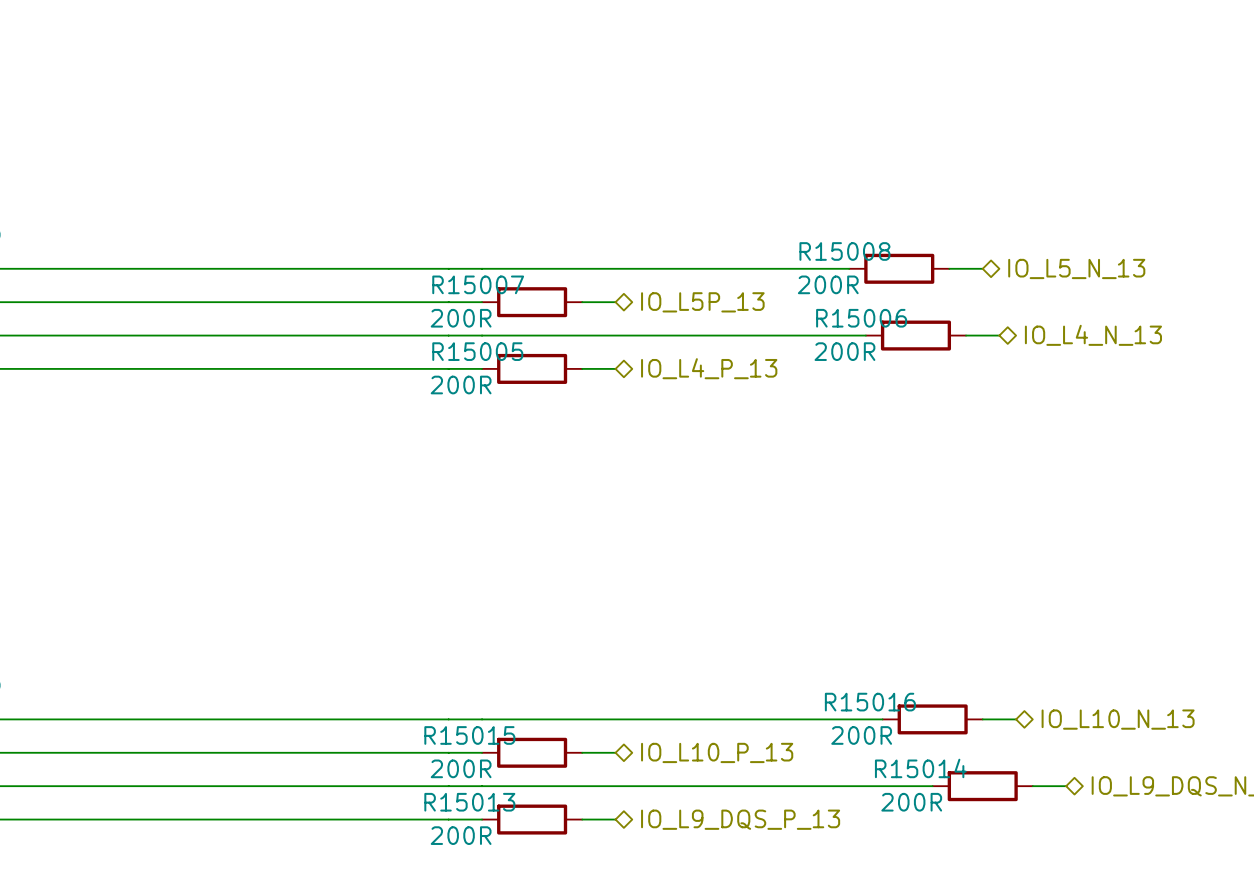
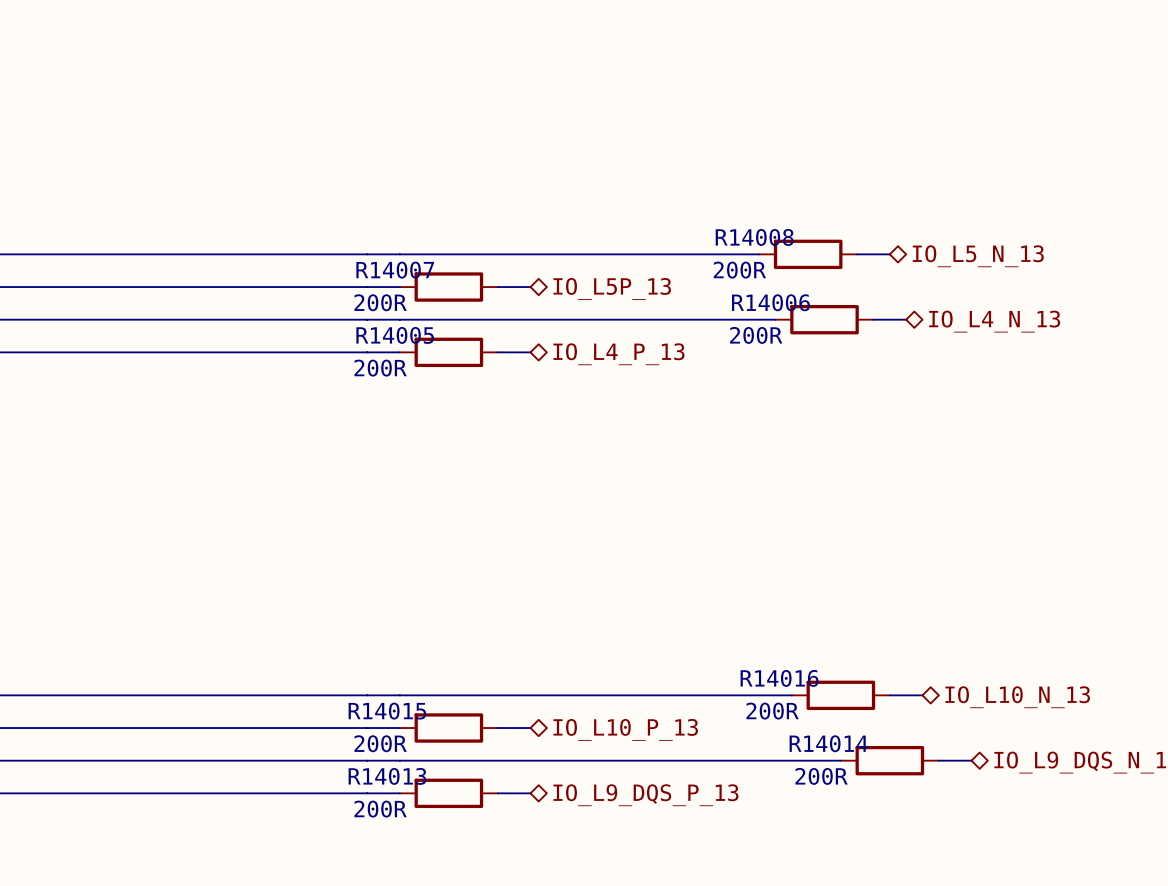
R15008 name: R15008 (844, 251) -> R14008 (754, 237)
R15007 name: R15007 (478, 284) -> R14007 (395, 270)
R15006 name: R15006 (861, 318) -> R14006 (770, 302)
R15005 name: R15005 (477, 351) -> R14005 (395, 335)
R15016 name: R15016 (870, 702) -> R14016 (779, 678)
R15015 name: R15015 (469, 735) -> R14015 (387, 711)
R15014 name: R15014 (920, 768) -> R14014 (828, 743)
R15013 name: R15013 (469, 802) -> R14013 (387, 776)

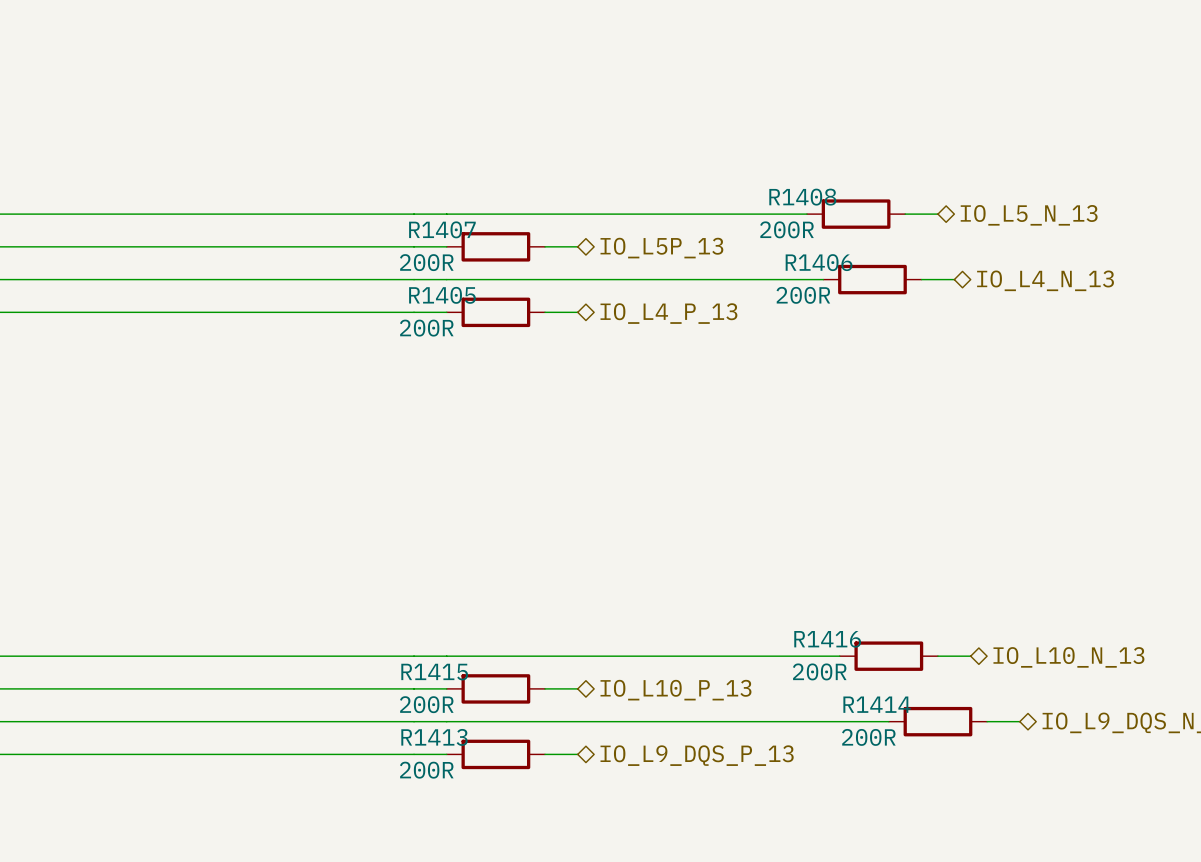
R14008 name: R14008 (754, 237) -> R1408 (802, 197)
R14007 name: R14007 (395, 270) -> R1407 (442, 229)
R14006 name: R14006 (770, 302) -> R1406 (819, 262)
R14005 name: R14005 (395, 335) -> R1405 (442, 295)
R14016 name: R14016 (779, 678) -> R1416 (827, 639)
R14015 name: R14015 (387, 711) -> R1415 (434, 672)
R14014 name: R14014 (828, 743) -> R1414 (877, 704)
R14013 name: R14013 (387, 776) -> R1413 (434, 737)

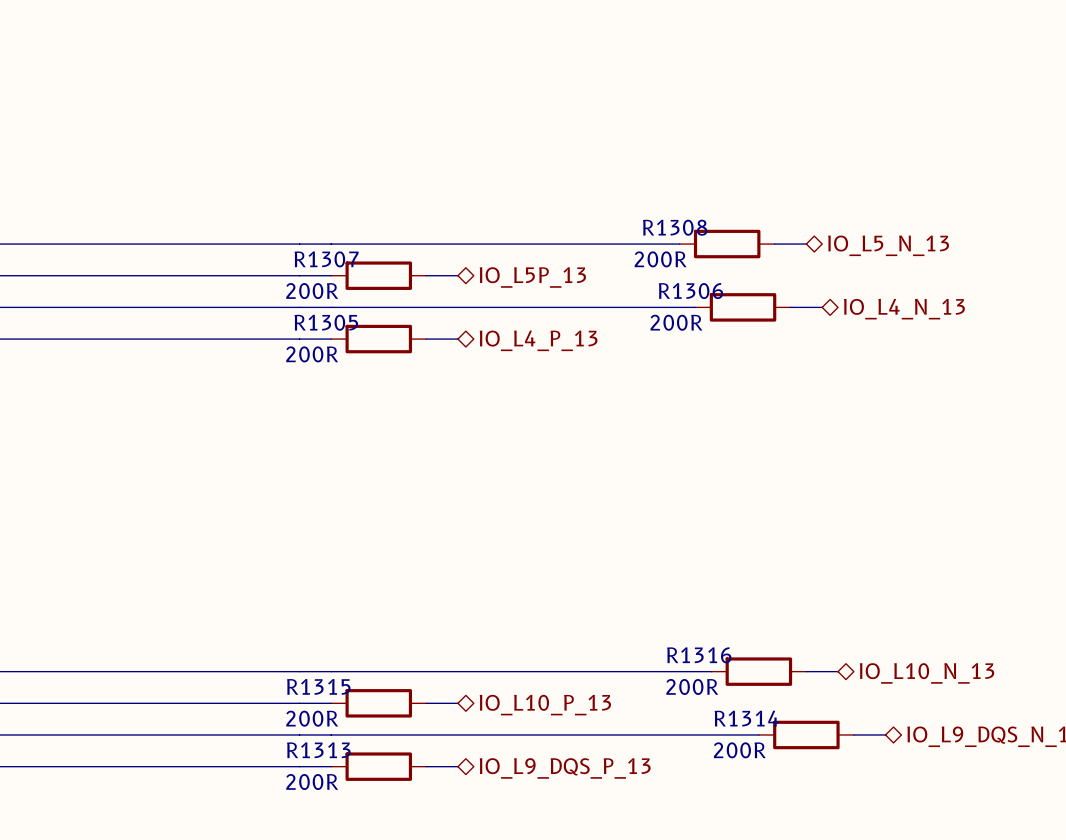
R1408 name: R1408 (802, 197) -> R1308 (675, 227)
R1407 name: R1407 (442, 229) -> R1307 (326, 259)
R1406 name: R1406 (819, 262) -> R1306 (690, 291)
R1405 name: R1405 (442, 295) -> R1305 (326, 322)
R1416 name: R1416 (827, 639) -> R1316 (699, 655)
R1415 name: R1415 (434, 672) -> R1315 (318, 686)
R1414 name: R1414 (877, 704) -> R1314 (746, 718)
R1413 name: R1413 (434, 737) -> R1313 (318, 750)

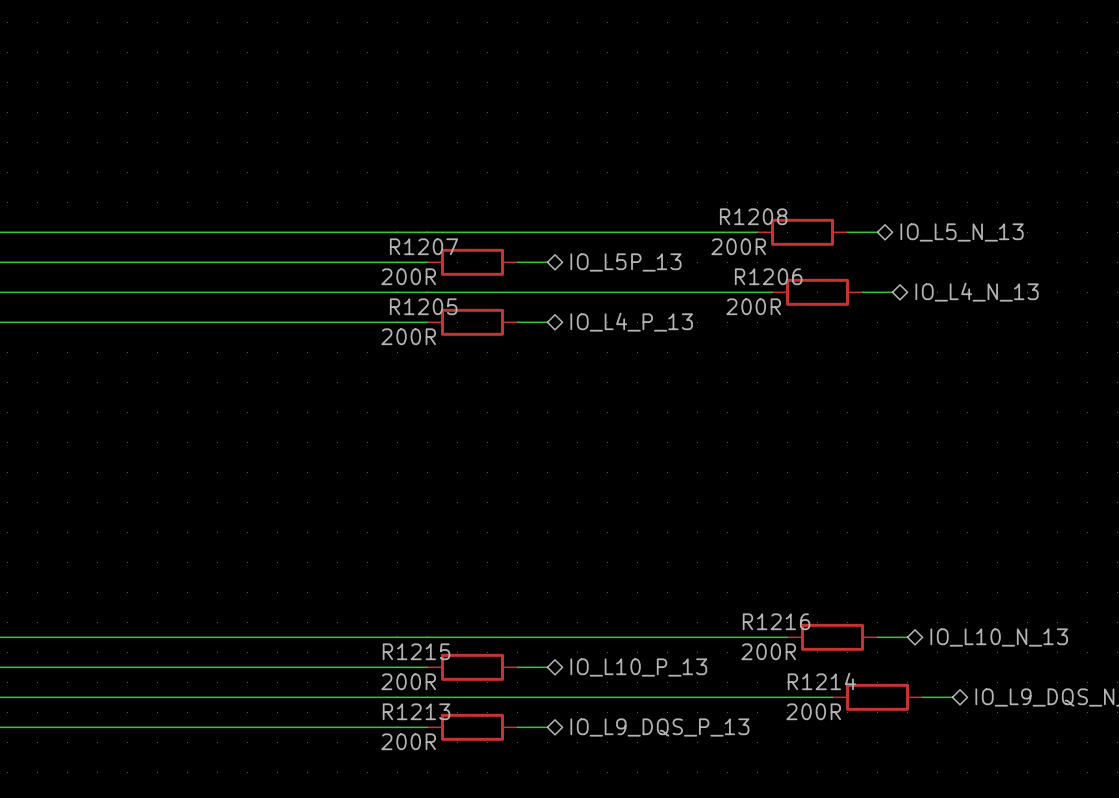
R1308 name: R1308 (675, 227) -> R1208 (753, 216)
R1307 name: R1307 (326, 259) -> R1207 (424, 246)
R1306 name: R1306 (690, 291) -> R1206 (768, 276)
R1305 name: R1305 (326, 322) -> R1205 (423, 306)
R1316 name: R1316 (699, 655) -> R1216 (776, 621)
R1315 name: R1315 (318, 686) -> R1215 (416, 651)
R1314 name: R1314 (746, 718) -> R1214 (821, 681)
R1313 name: R1313 (318, 750) -> R1213 (416, 711)

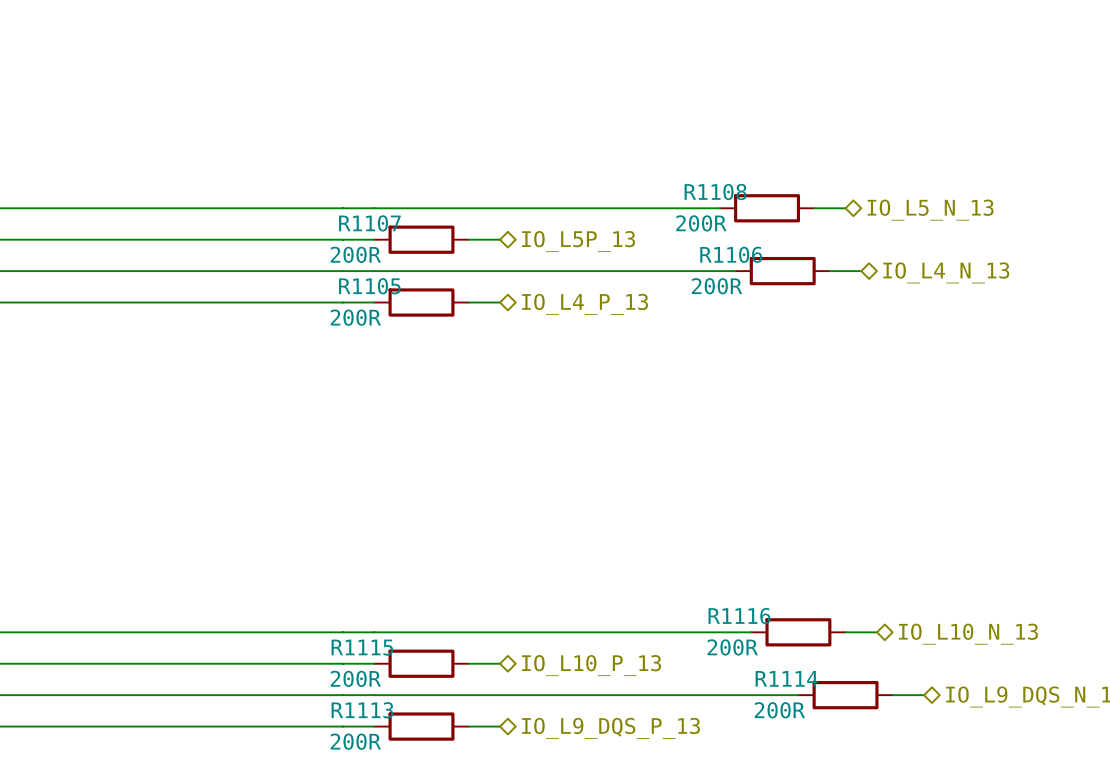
R1208 name: R1208 (753, 216) -> R1108 (715, 192)
R1207 name: R1207 (424, 246) -> R1107 (369, 223)
R1206 name: R1206 (768, 276) -> R1106 (731, 254)
R1205 name: R1205 (423, 306) -> R1105 (369, 286)
R1216 name: R1216 (776, 621) -> R1116 (739, 616)
R1215 name: R1215 (416, 651) -> R1115 (362, 647)
R1214 name: R1214 (821, 681) -> R1114 (786, 678)
R1213 name: R1213 (416, 711) -> R1113 (362, 710)

